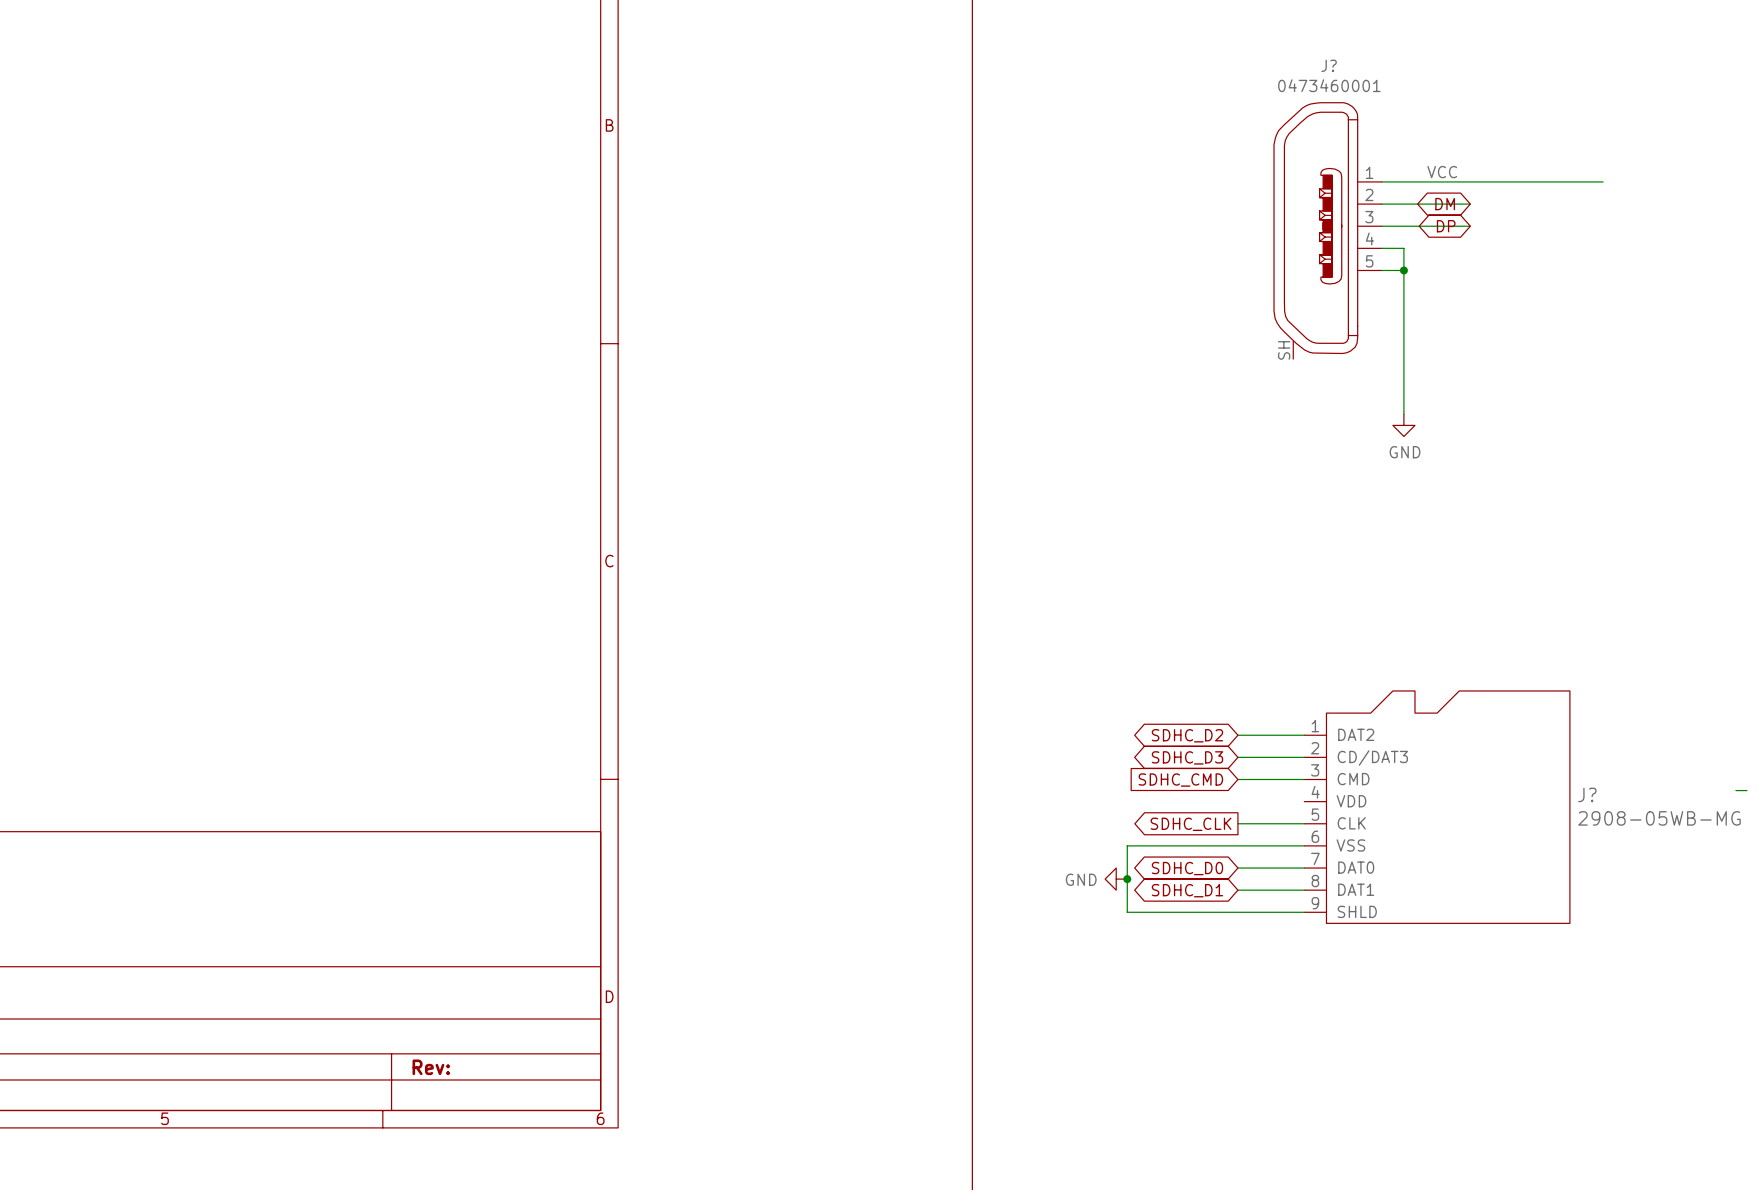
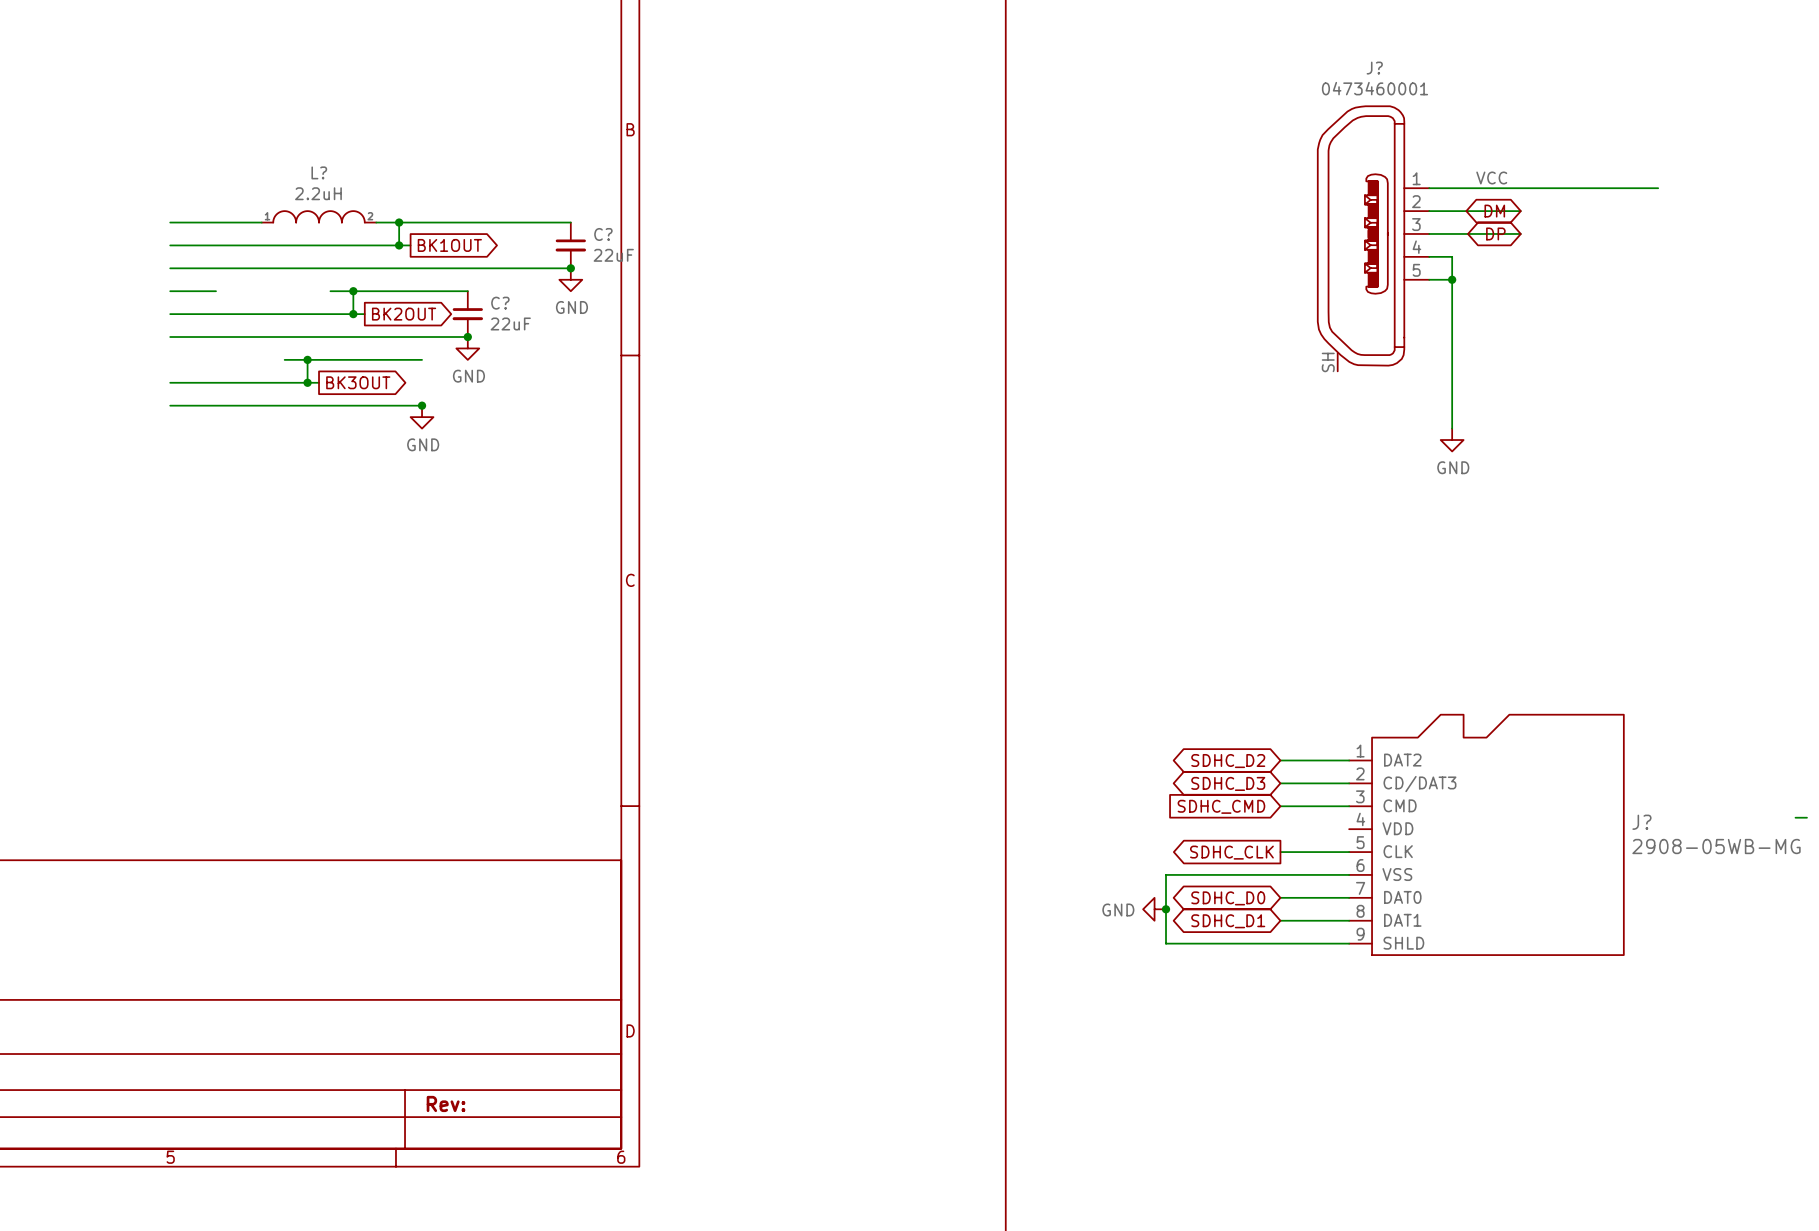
L?: none -> 2.2uH (319, 216)
wire: none -> (170, 222) (261, 222)
wire: none -> (376, 222) (570, 222)
wire: none -> (399, 222) (399, 245)
junction: none -> (399, 222)
wire: none -> (170, 245) (410, 245)
junction: none -> (399, 245)
global label: none -> BK1OUT (449, 245)
C?: none -> 22uF (570, 245)
wire: none -> (170, 268) (570, 268)
junction: none -> (570, 268)
power symbol: none -> GND (570, 279)
wire: none -> (170, 291) (216, 291)
wire: none -> (330, 291) (467, 291)
wire: none -> (353, 291) (353, 314)
junction: none -> (353, 291)
wire: none -> (170, 314) (364, 314)
junction: none -> (353, 314)
global label: none -> BK2OUT (404, 314)
C?: none -> 22uF (467, 314)
wire: none -> (170, 337) (467, 337)
junction: none -> (467, 337)
power symbol: none -> GND (467, 348)
wire: none -> (284, 359) (422, 359)
wire: none -> (307, 359) (307, 382)
junction: none -> (307, 359)
wire: none -> (170, 382) (319, 382)
junction: none -> (307, 382)
global label: none -> BK3OUT (358, 382)
wire: none -> (170, 405) (422, 405)
junction: none -> (422, 405)
power symbol: none -> GND (422, 417)

